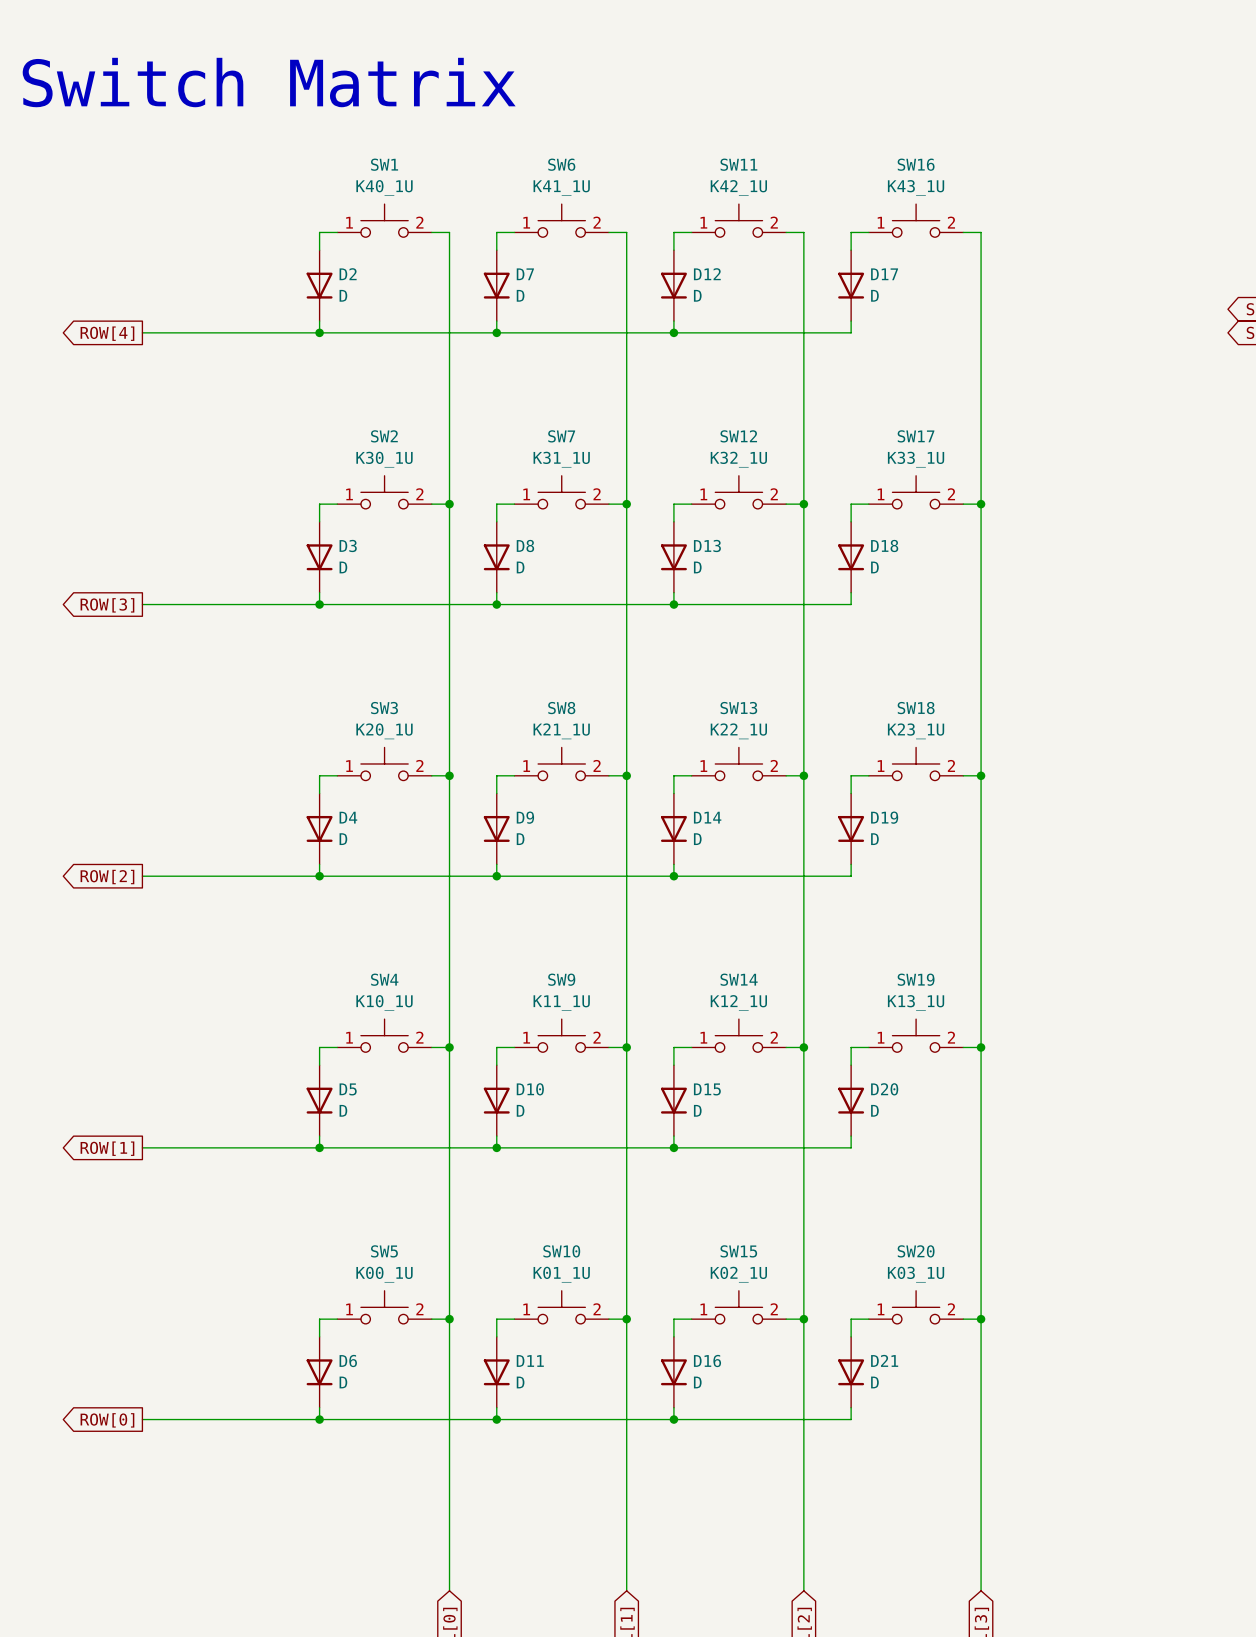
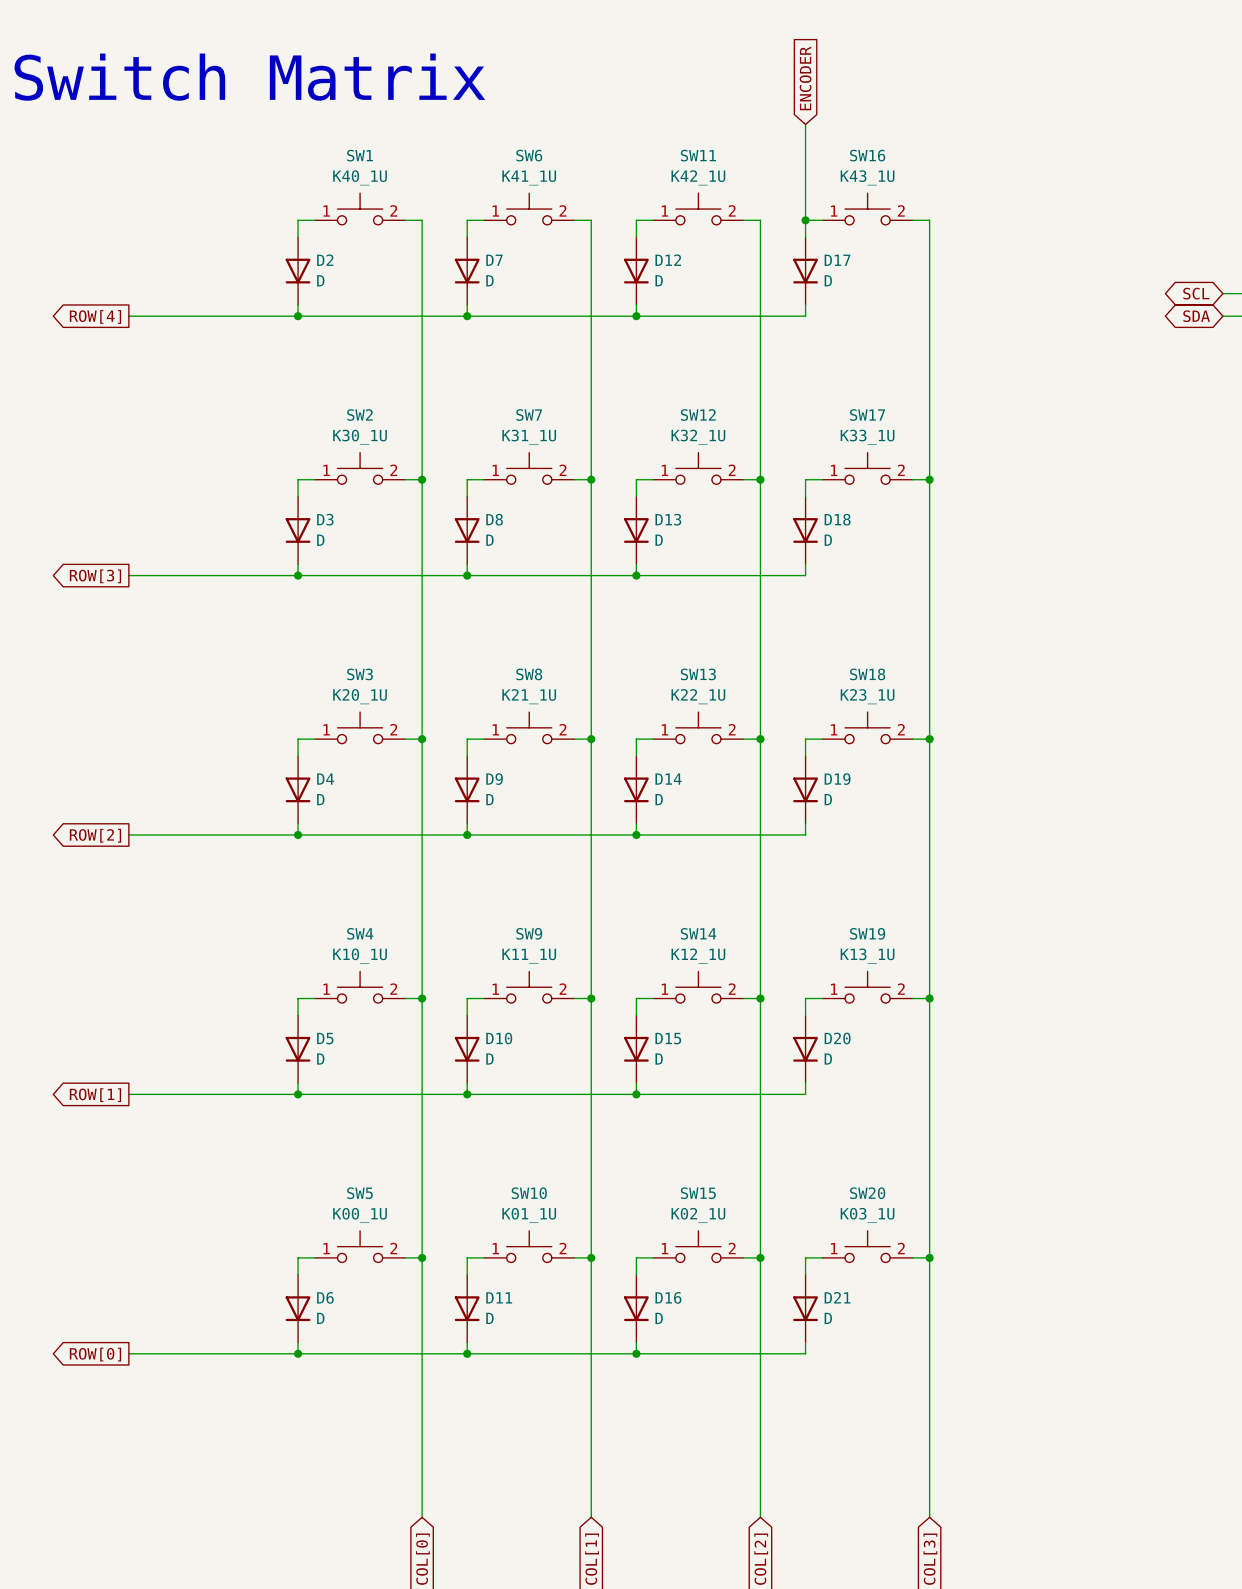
global label: none -> ENCODER (805, 78)
wire: none -> (805, 124) (805, 220)
junction: none -> (805, 220)

